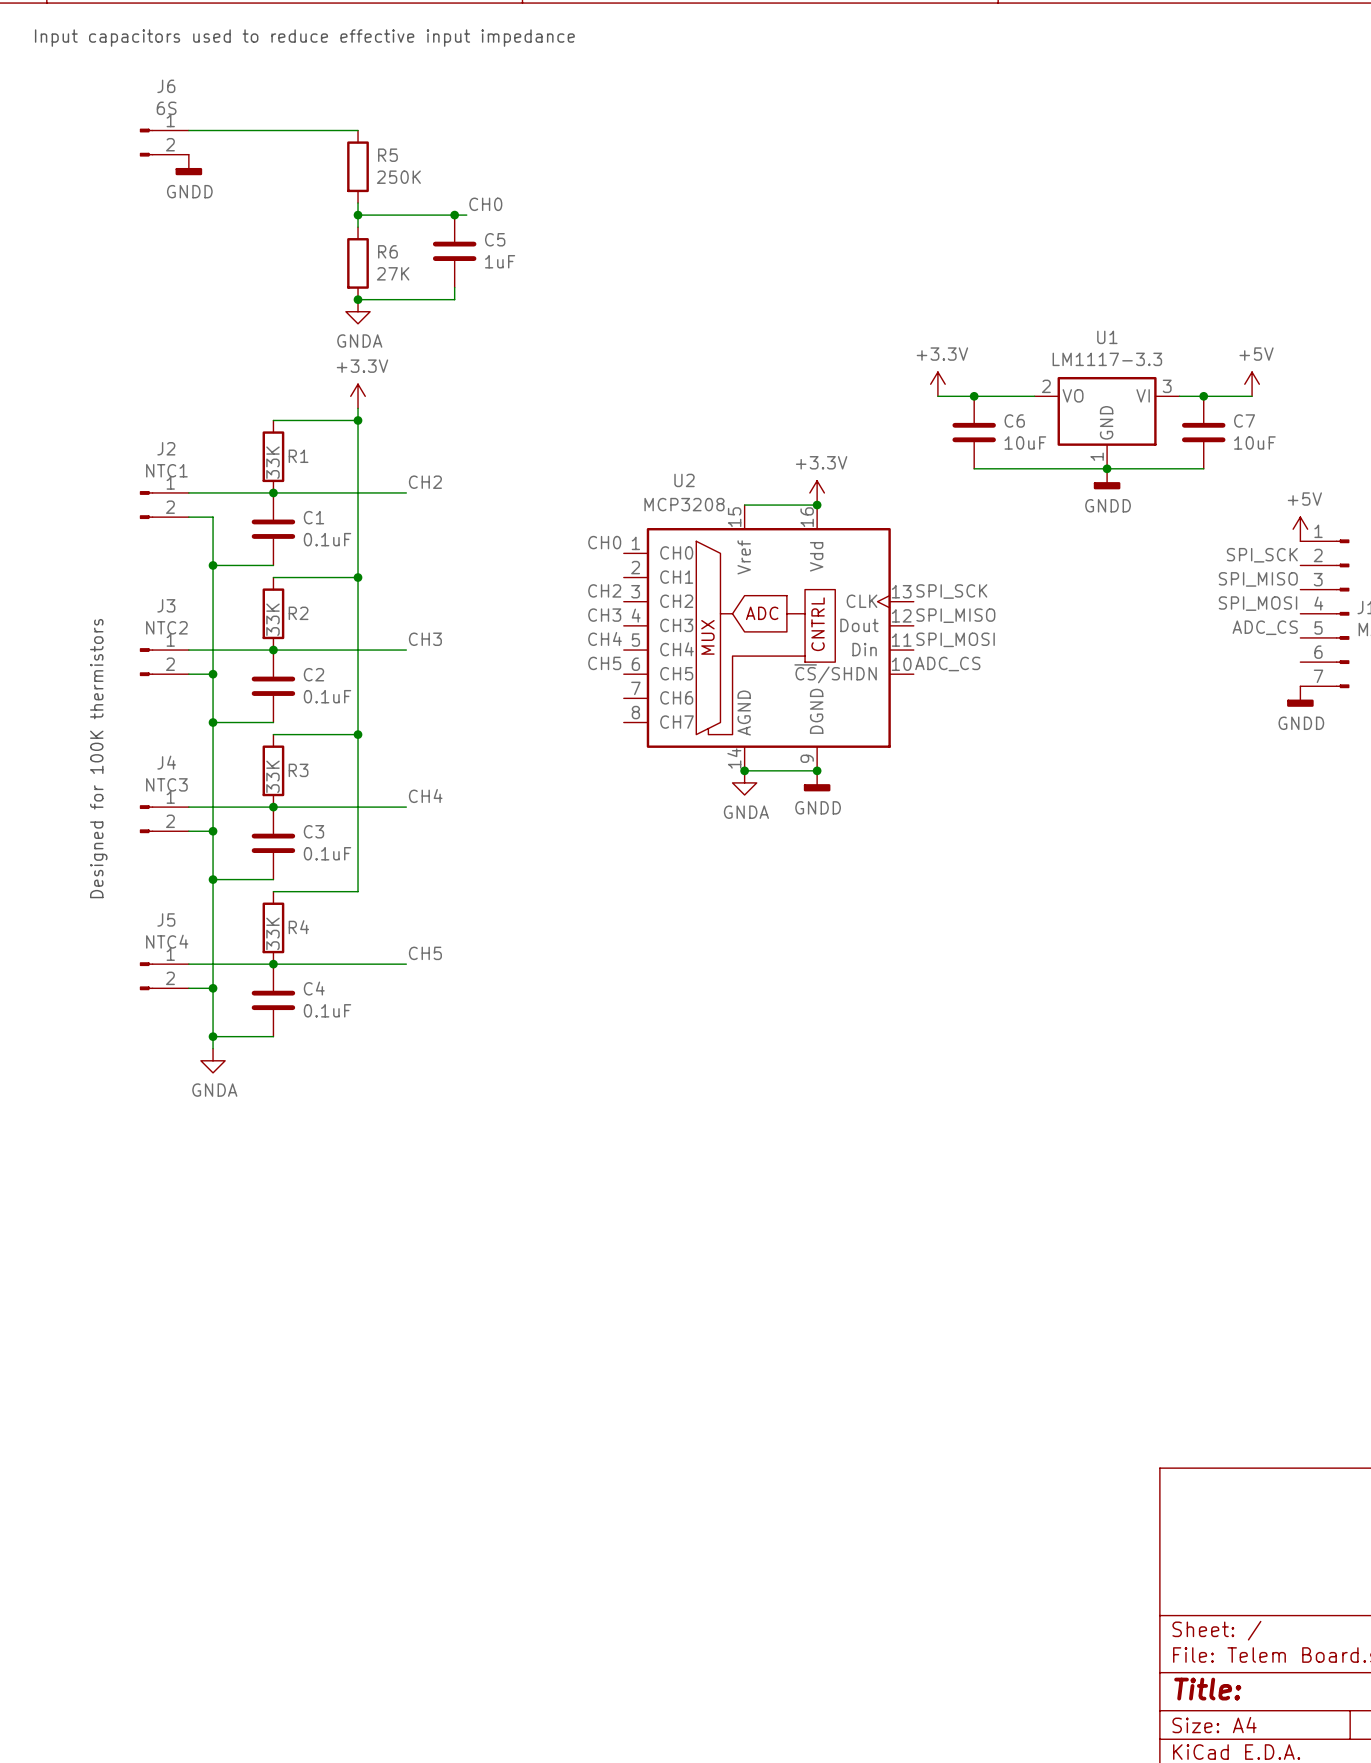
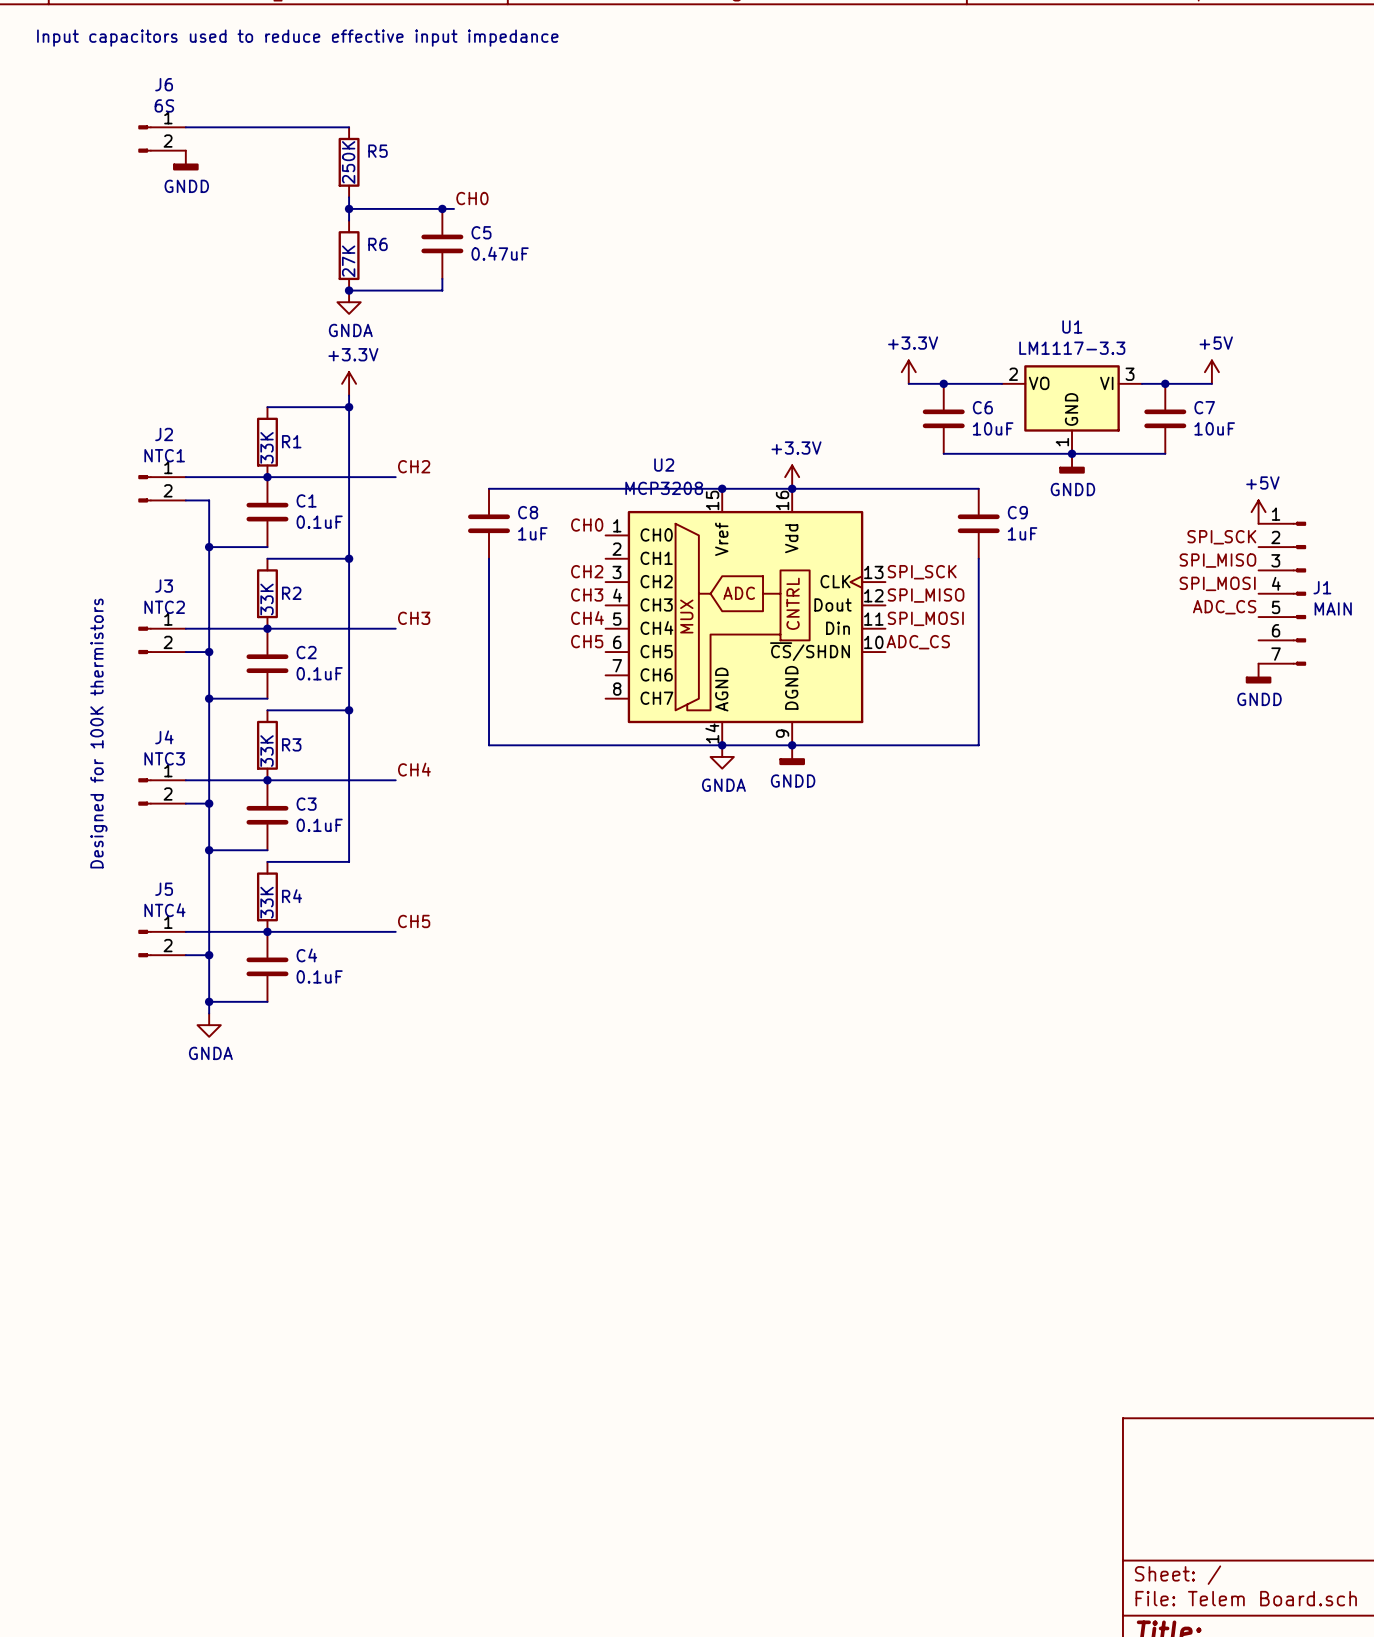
R5 value rotation: 0° (398, 177) -> 90° counterclockwise (348, 162)
C5 value: 1uF (500, 261) -> 0.47uF (500, 253)
R6 value rotation: 0° (393, 273) -> 90° counterclockwise (348, 261)
wire: none -> (489, 488) (722, 488)
junction: none -> (722, 488)
wire: none -> (792, 488) (978, 488)
C8: none -> 1uF (489, 523)
C9: none -> 1uF (978, 523)
wire: none -> (489, 558) (489, 745) (722, 745)
wire: none -> (978, 558) (978, 745) (792, 745)

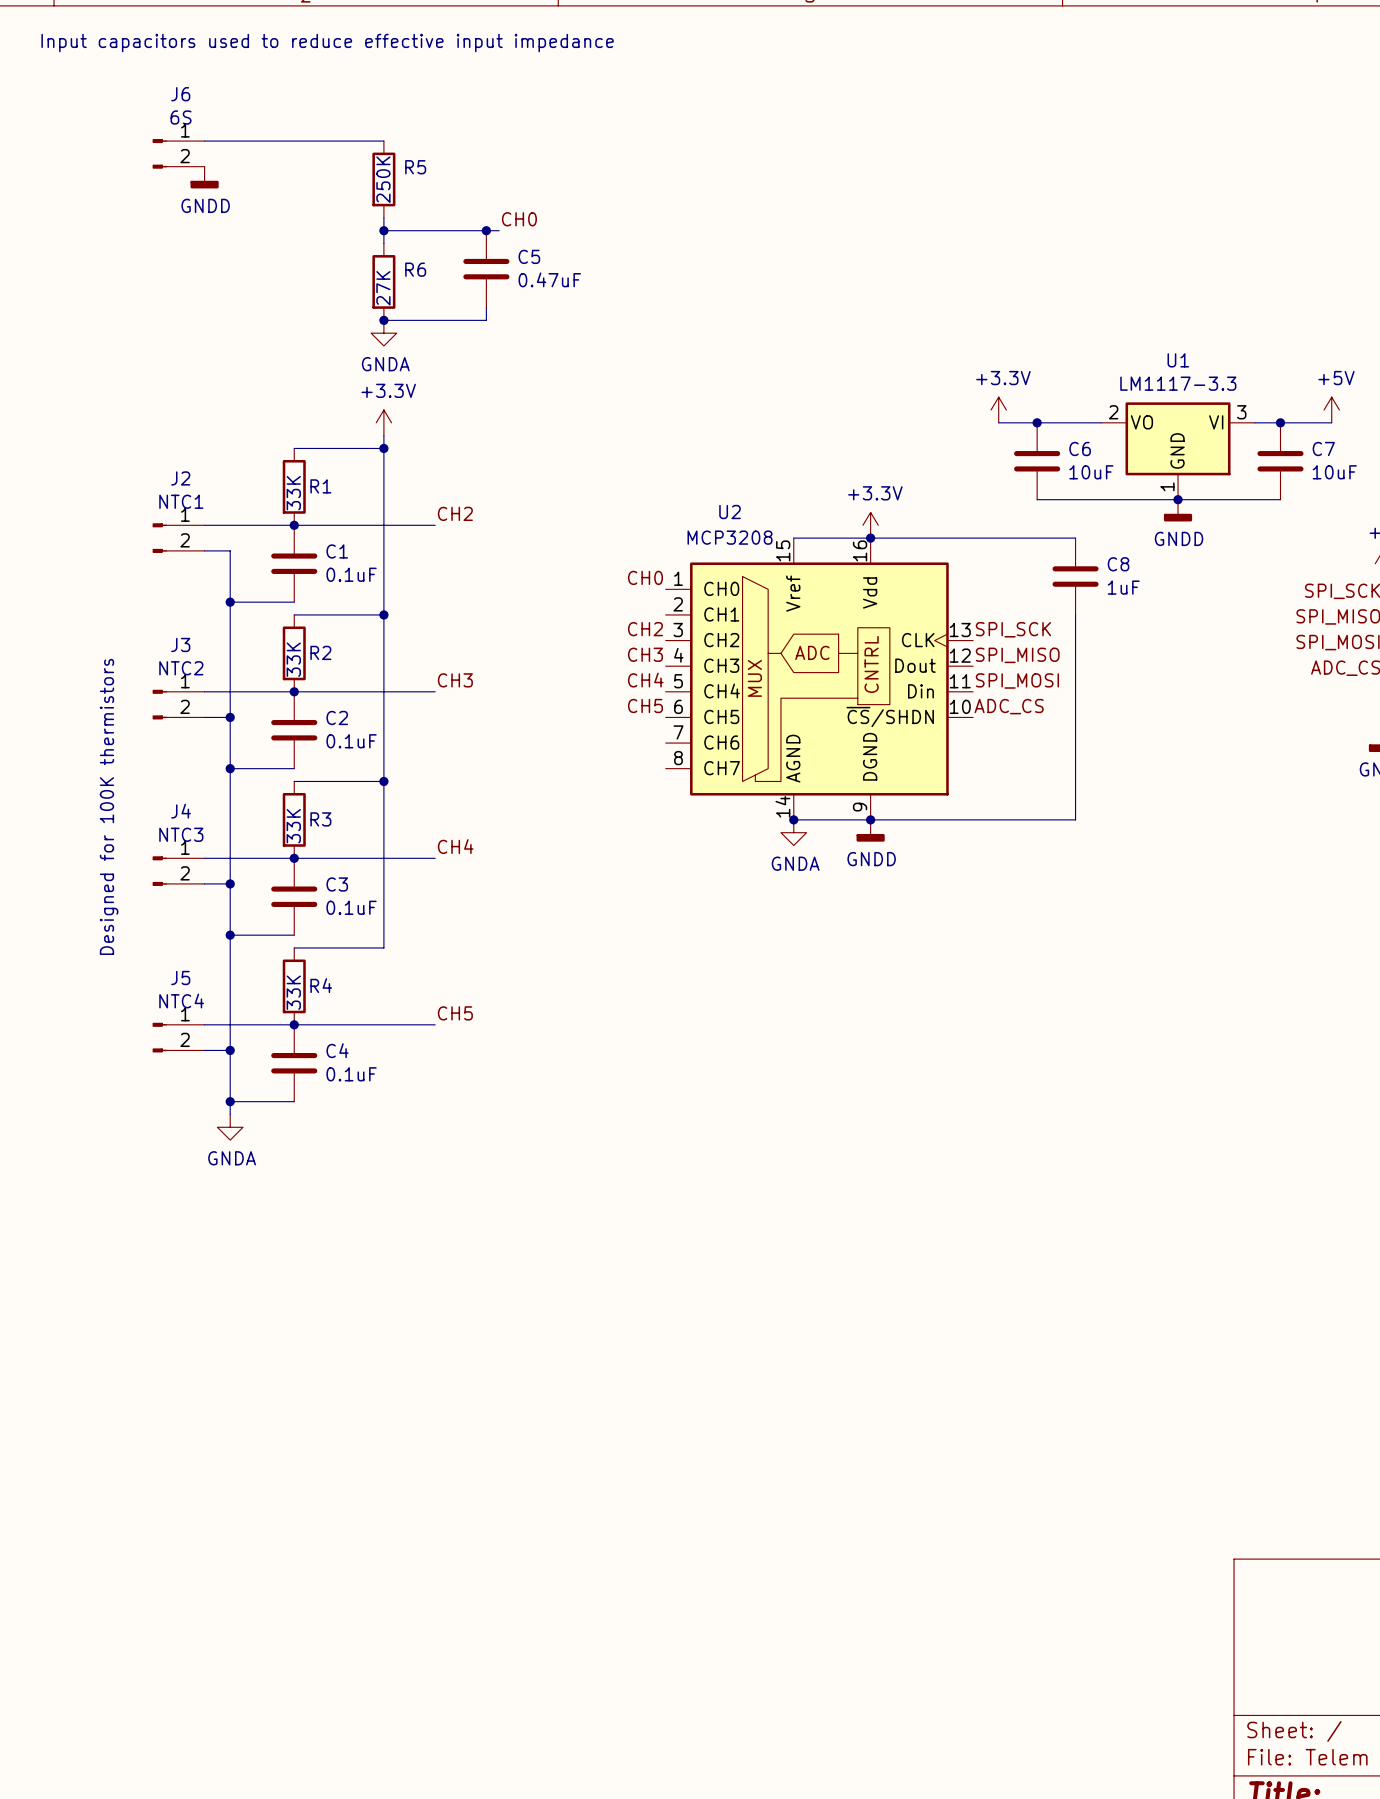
wire: (489, 488) (722, 488) -> none
junction: (722, 488) -> none
C9 name: C9 (1017, 512) -> C8 (1118, 564)
C8: 1uF (489, 523) -> none
wire: (489, 558) (489, 745) (722, 745) -> none

